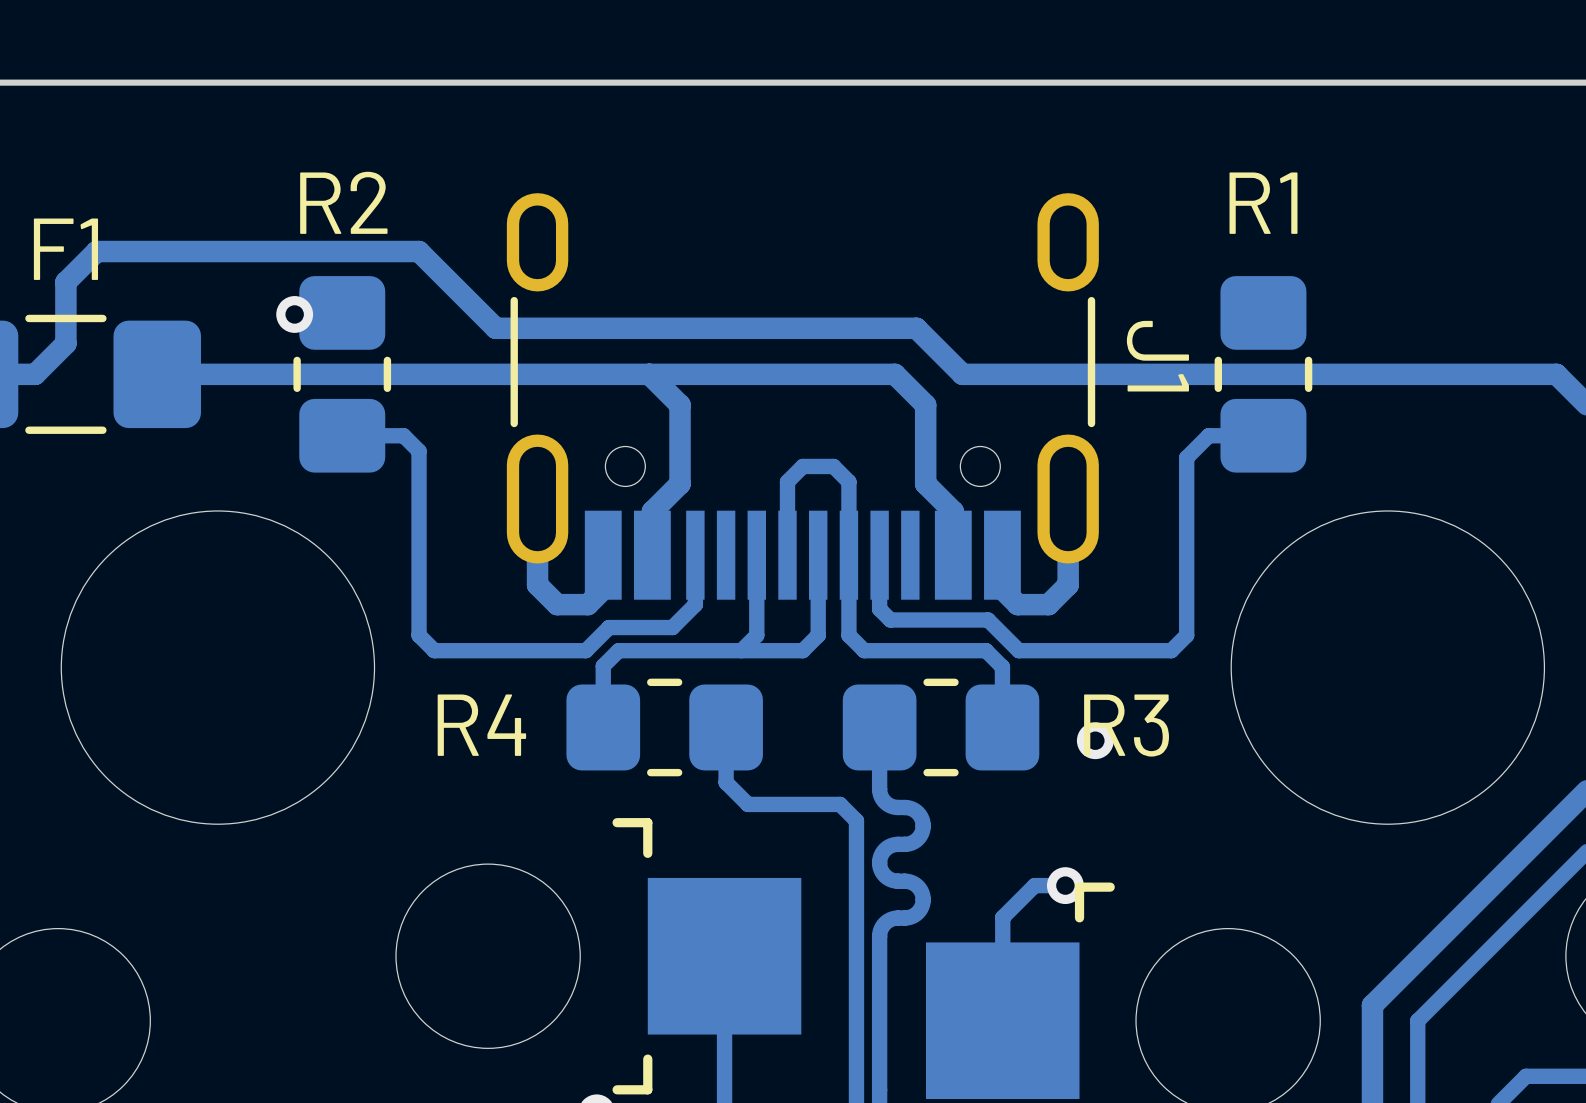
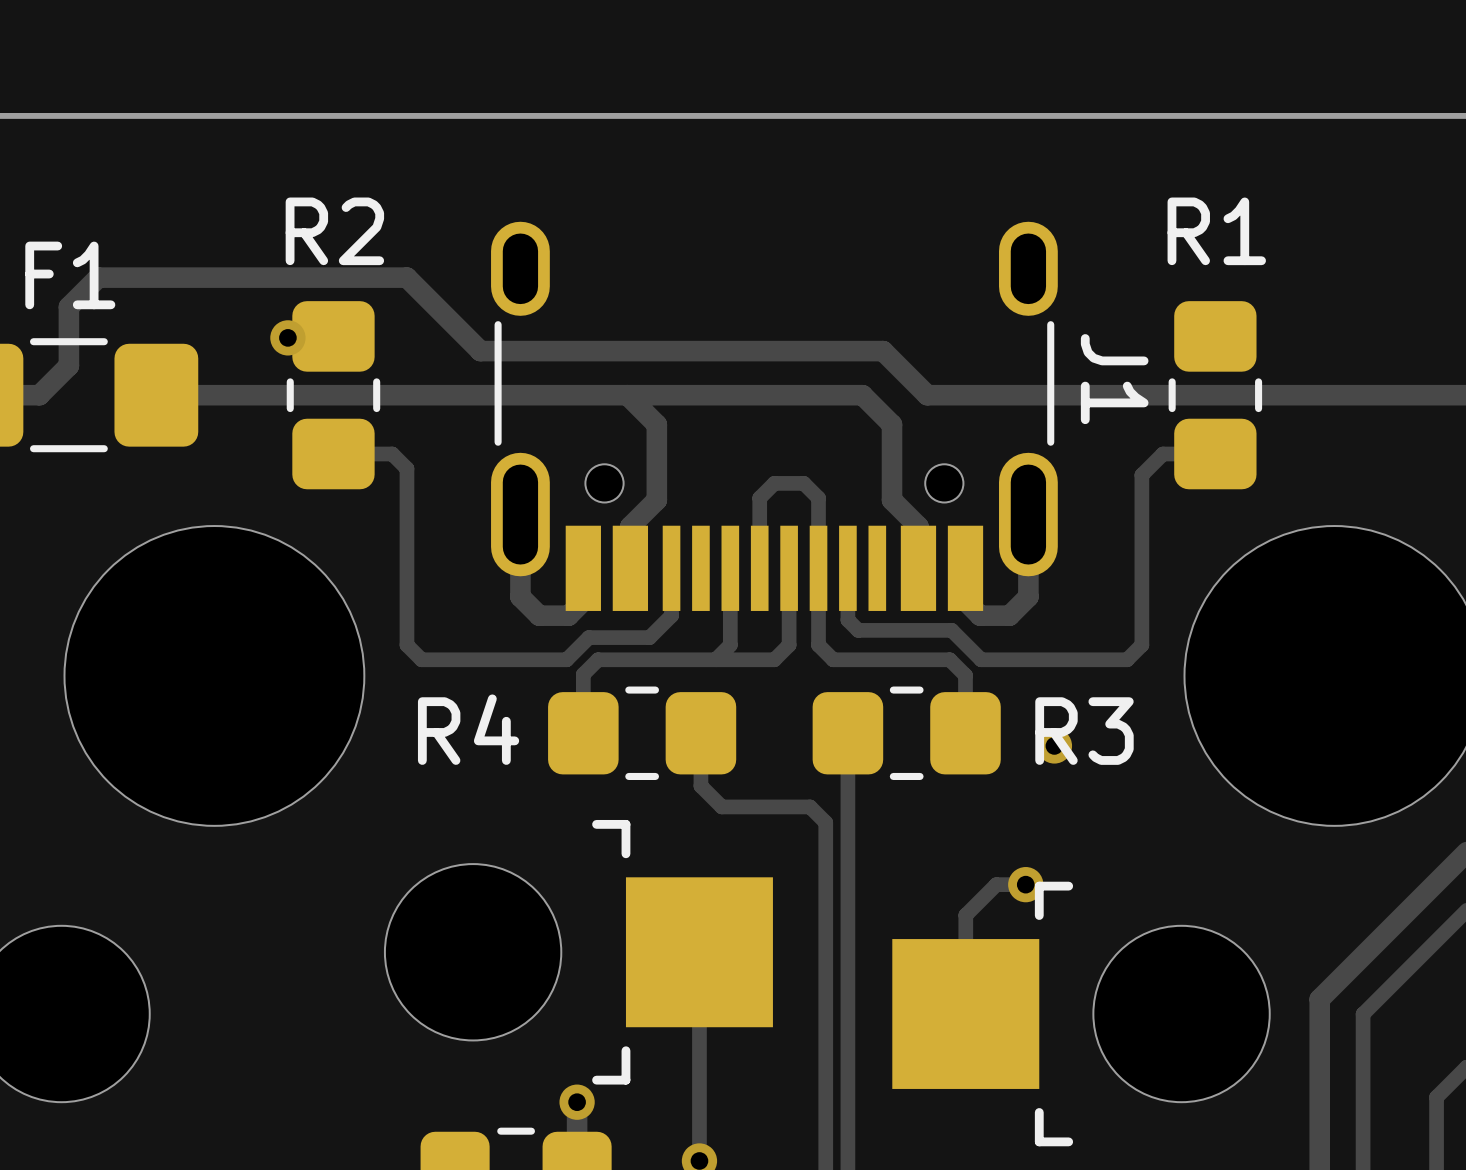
track: (879, 789) (882, 798) (888, 805) (909, 808) (916, 811) (921, 818) (923, 825) (921, 832) (916, 840) (909, 843) (891, 845) (881, 855) (879, 865) (885, 875) (893, 880) (914, 883) (920, 890) (923, 899) (920, 908) (914, 915) (893, 918) (886, 921) (882, 927) (879, 936) -> (847, 792) (847, 933)

